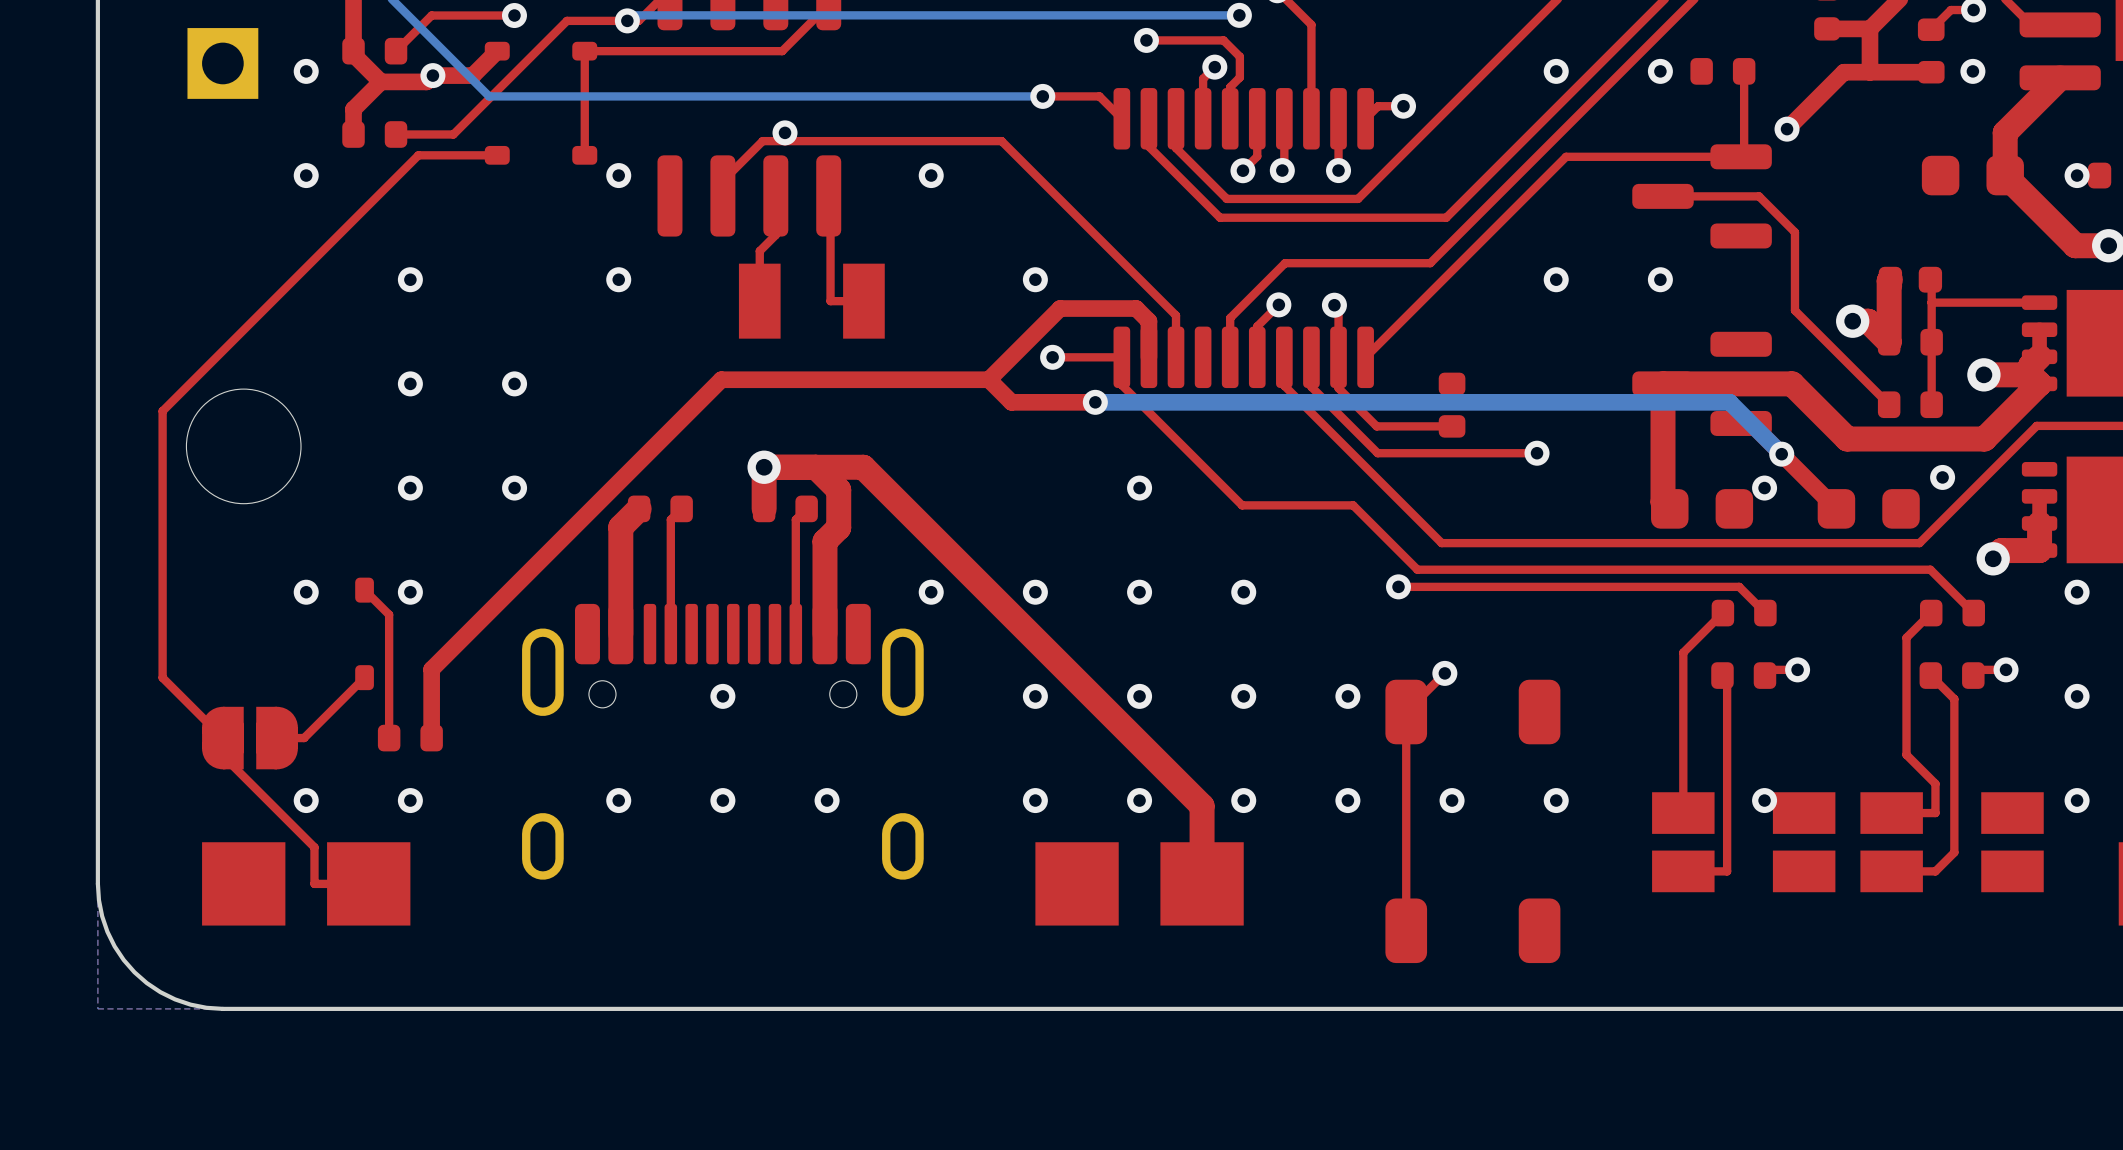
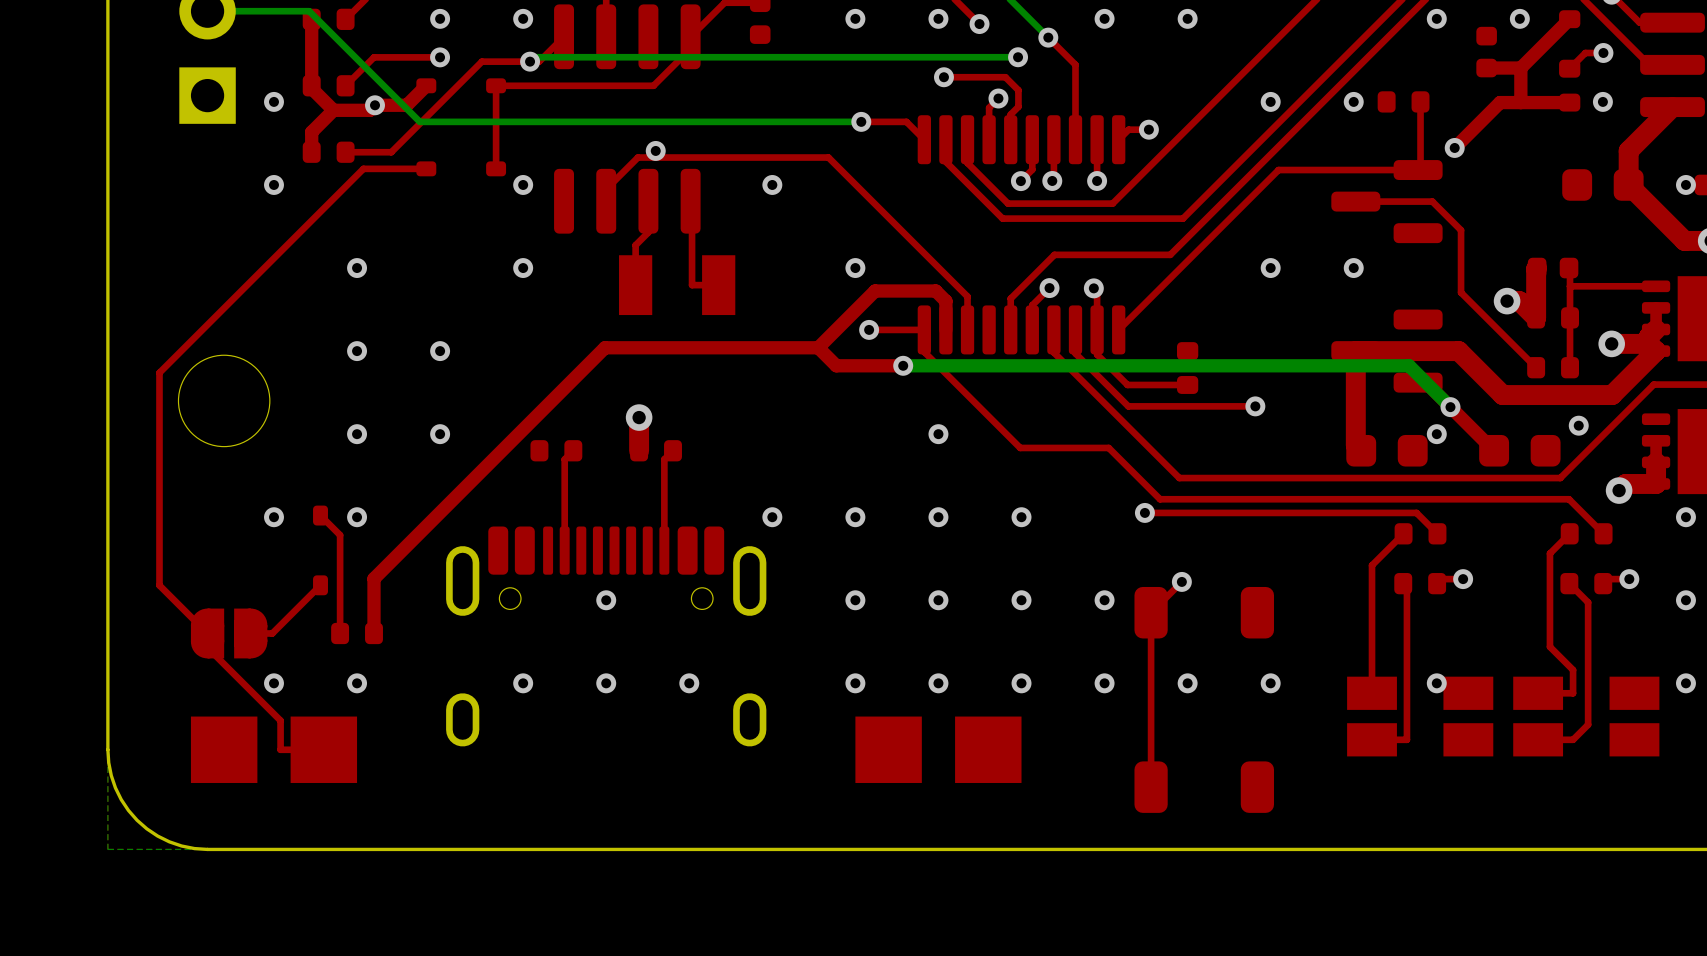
top track: (764, 467) (863, 467) (1202, 806) (1202, 883) -> none
top track: (815, 467) (838, 490) (838, 527) (824, 541) (824, 634) -> none
top track: (639, 508) (620, 527) (620, 634) -> none

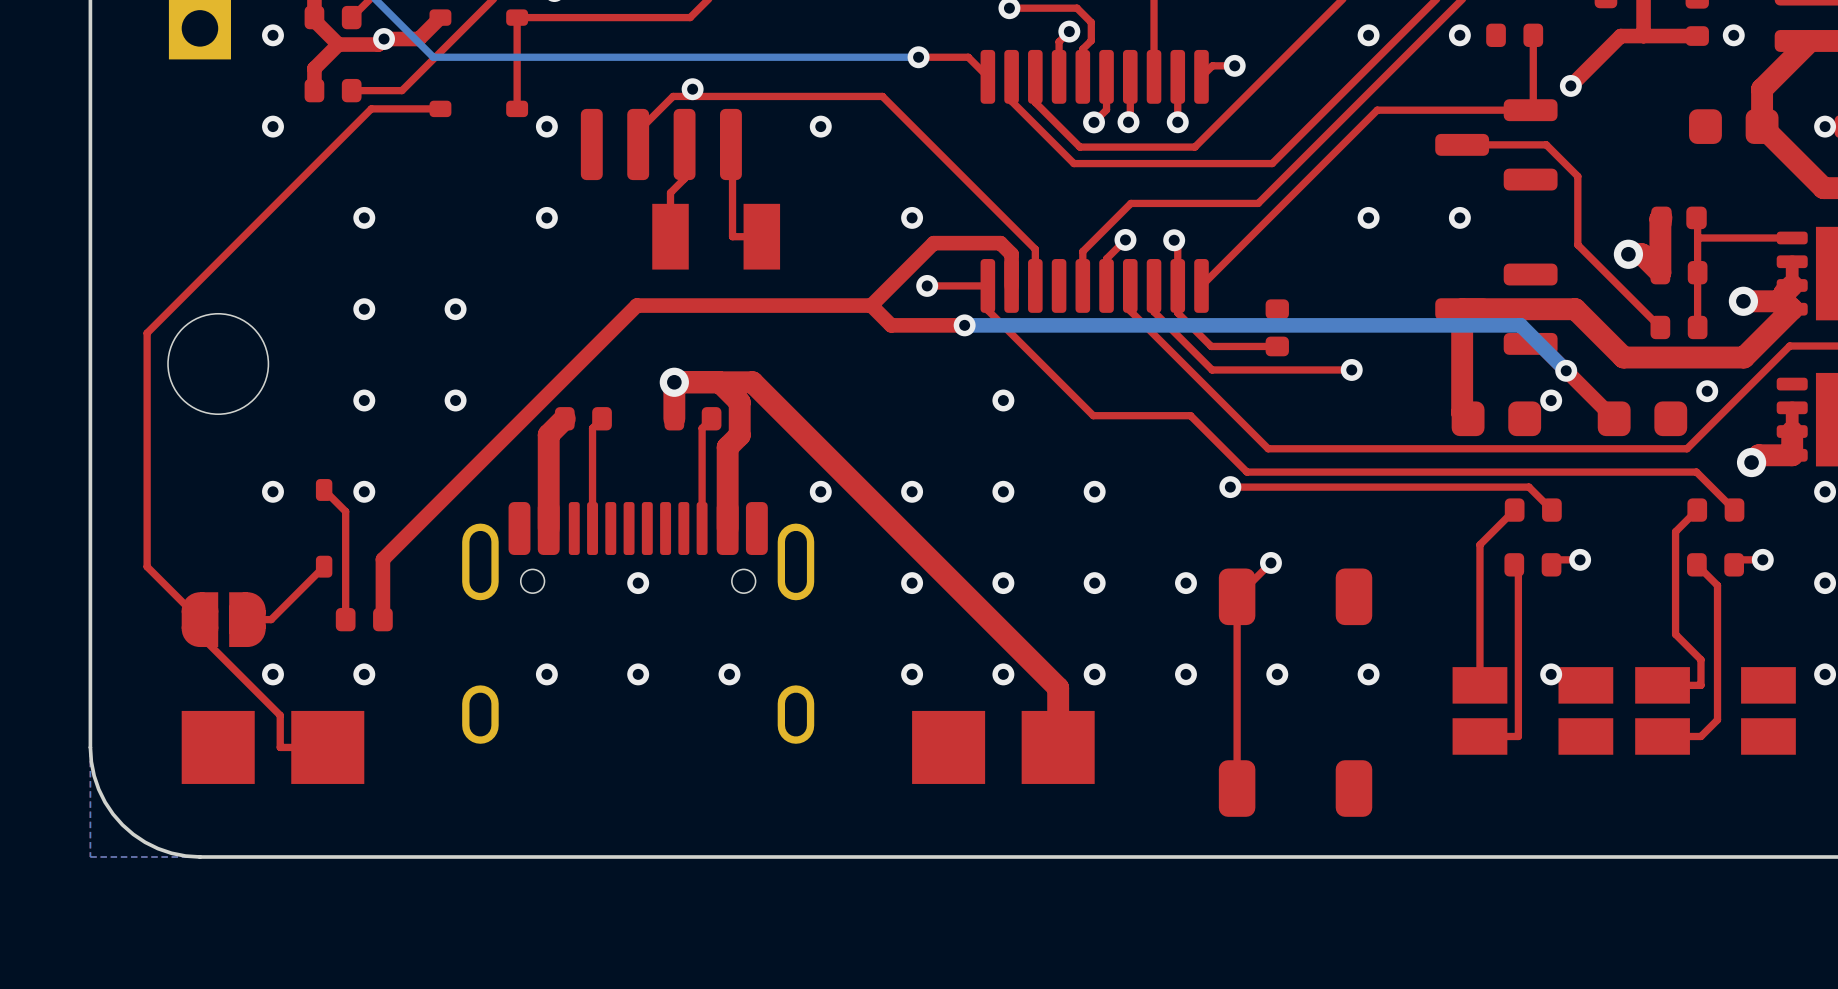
top track: none -> (674, 382) (752, 382) (1058, 687) (1058, 747)
top track: none -> (719, 382) (739, 402) (739, 435) (727, 447) (727, 528)
top track: none -> (564, 418) (548, 434) (548, 528)

